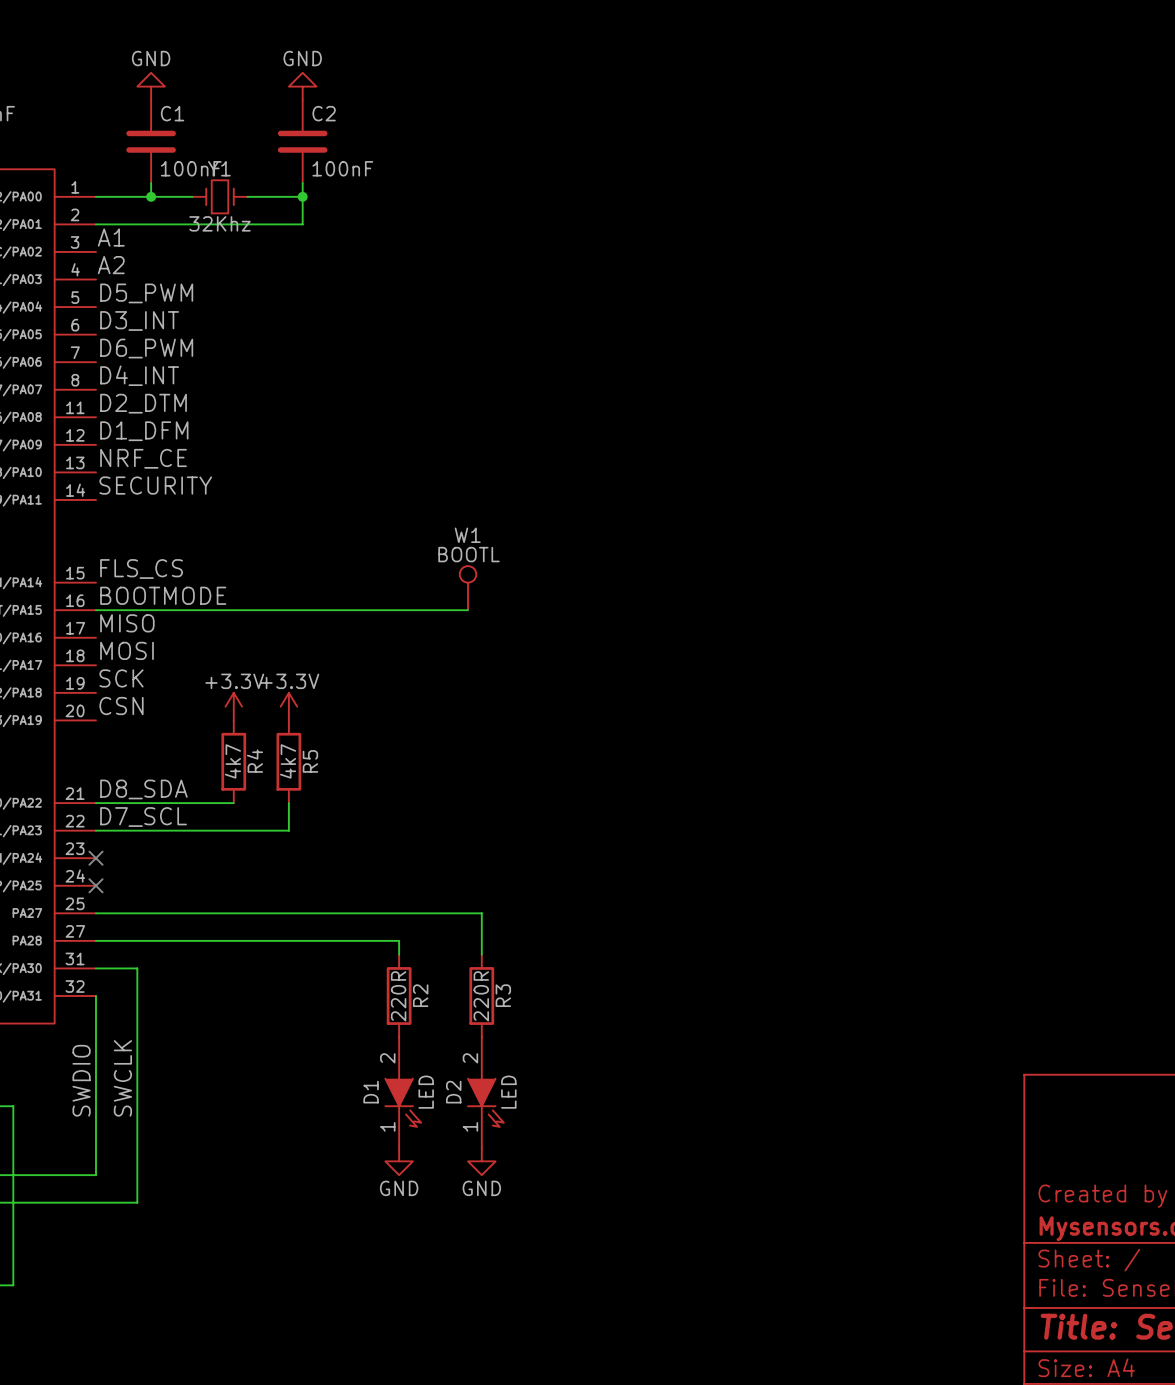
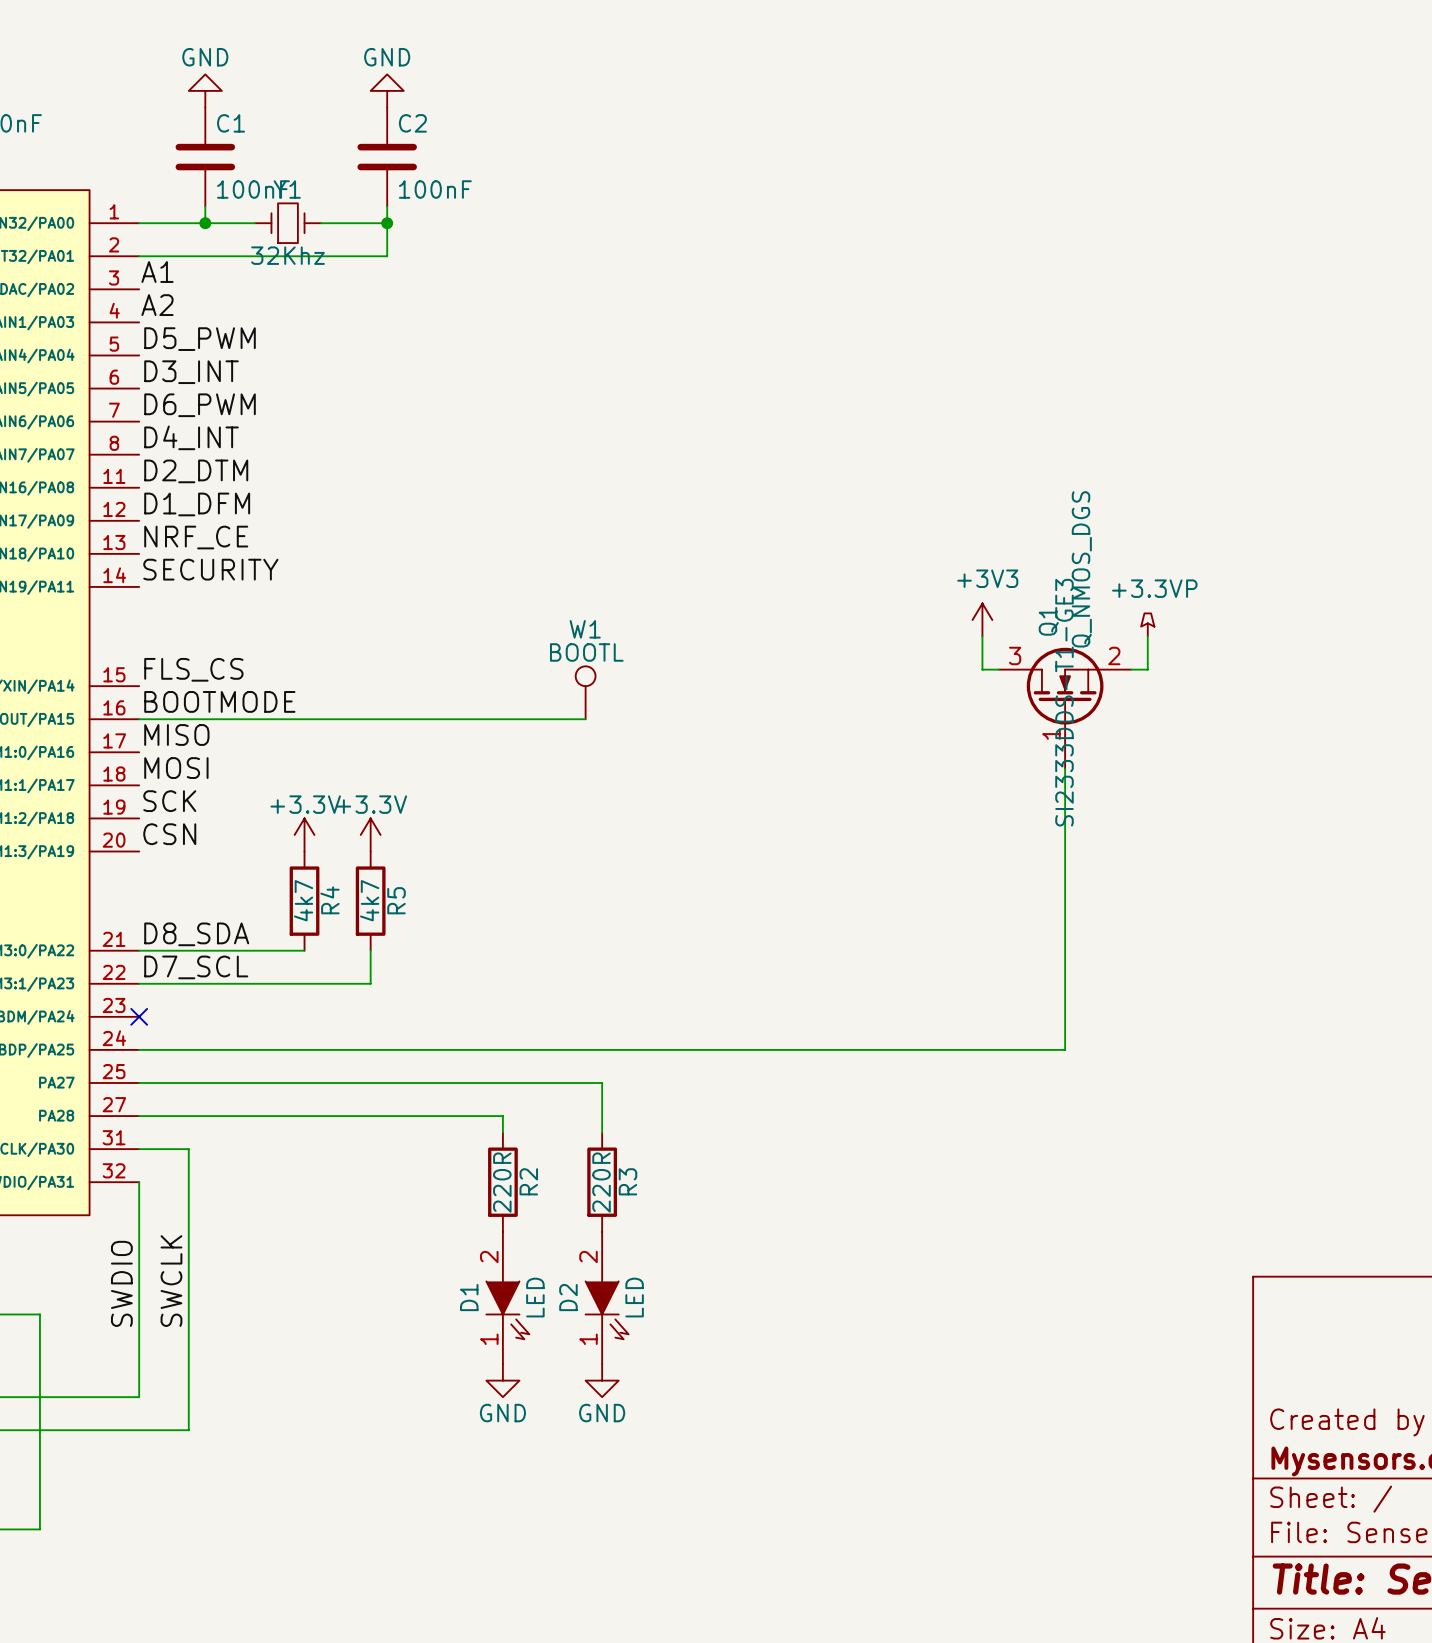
power symbol: none -> +3V3 (982, 620)
power symbol: none -> +3.3VP (1147, 624)
wire: none -> (982, 636) (982, 669) (998, 669)
wire: none -> (1147, 636) (1147, 669) (1131, 669)
Q1: none -> Q_NMOS_DGS (1065, 708)
wire: none -> (1065, 768) (1065, 1049) (139, 1049)
no-connect mark: (95, 885) -> none

